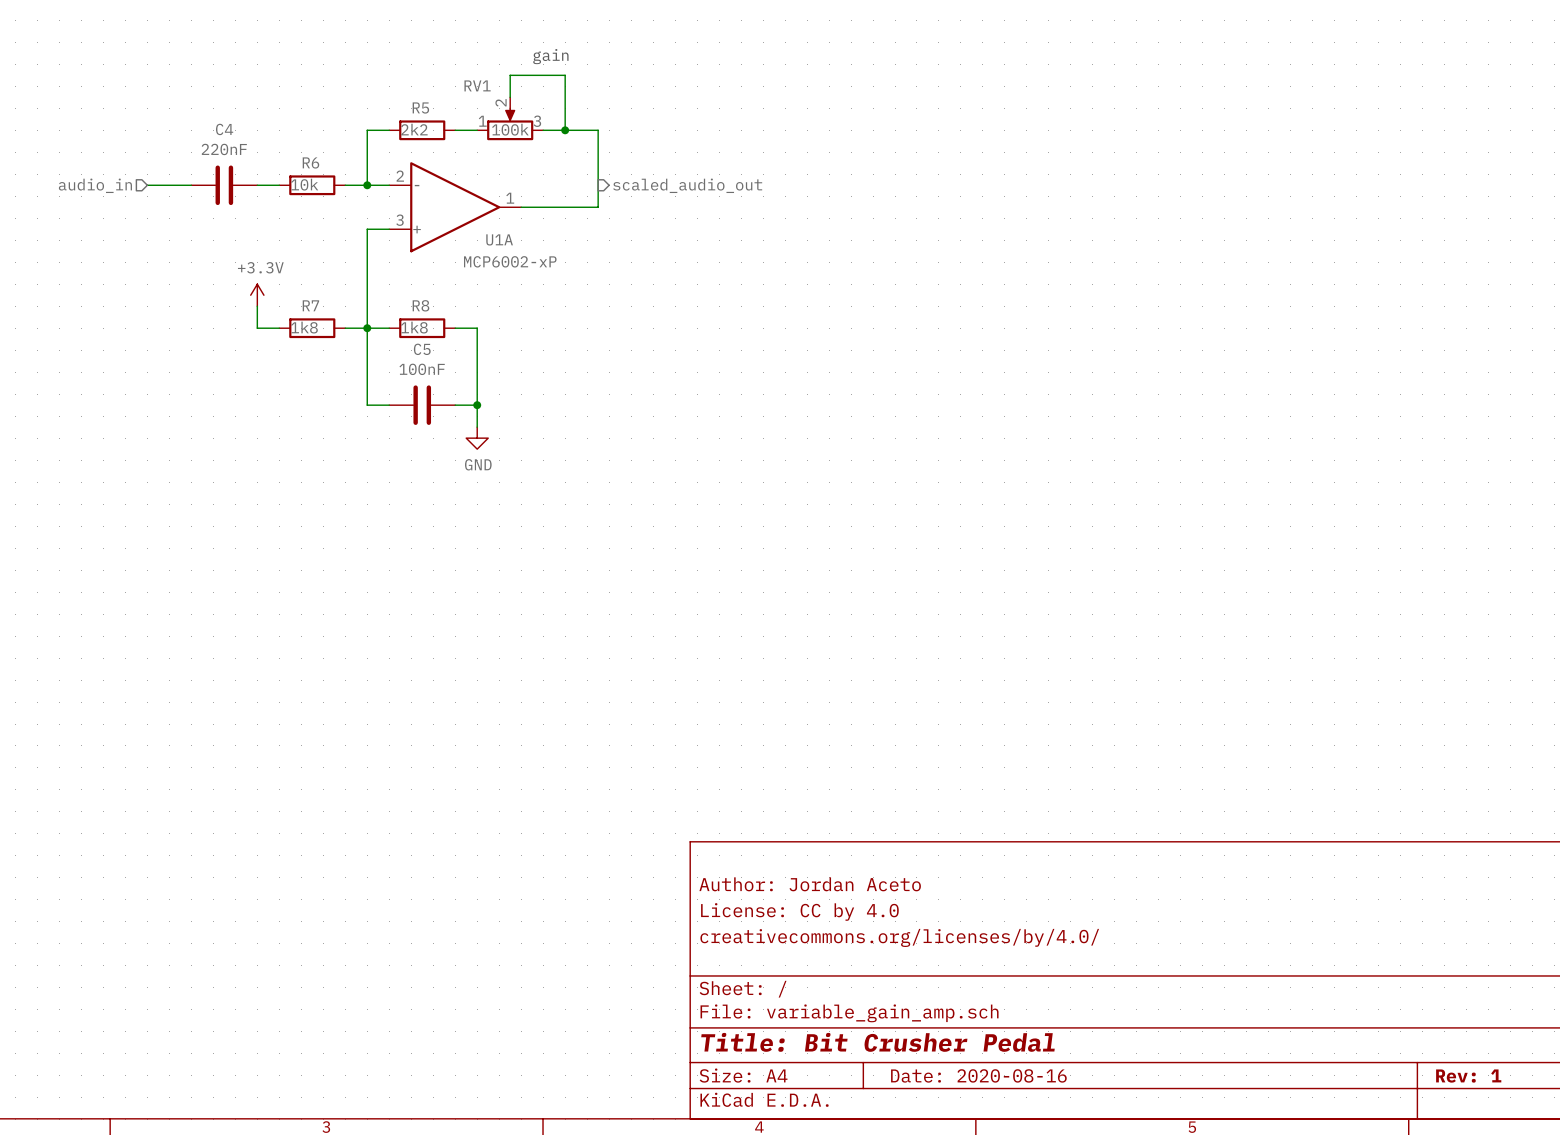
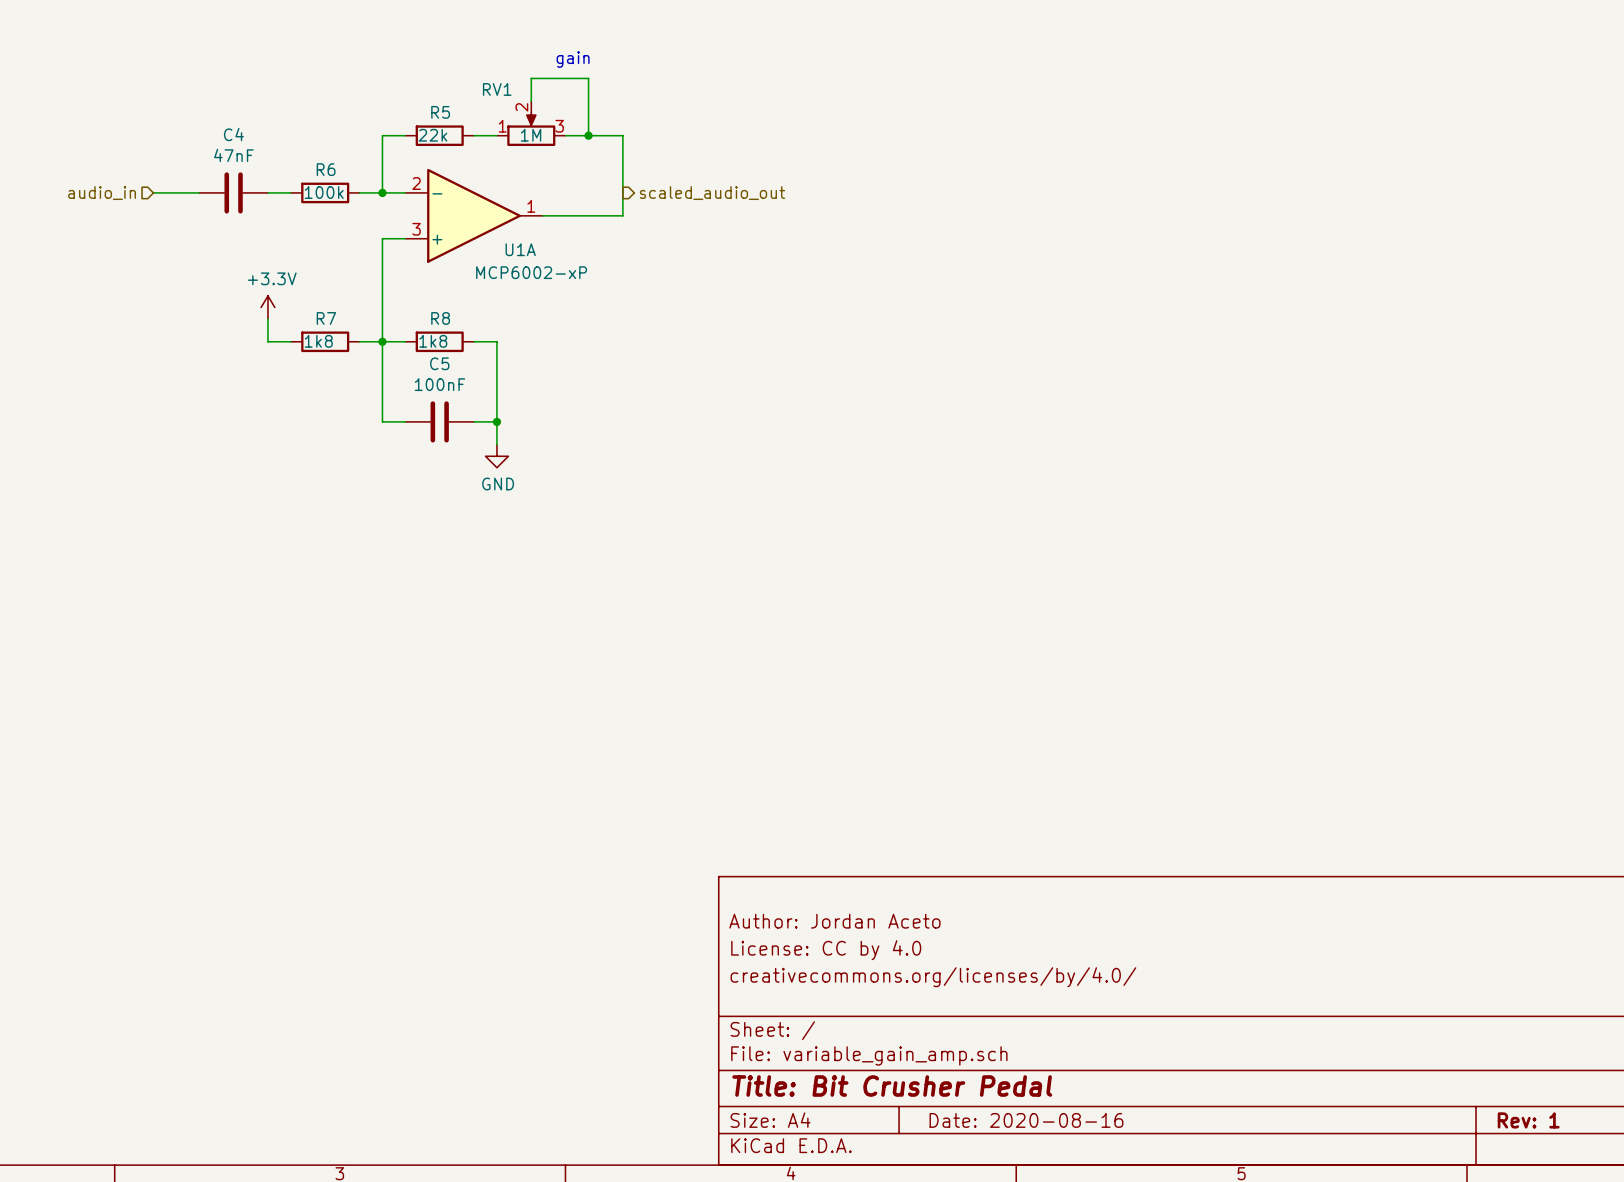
R5 value: 2k2 (414, 129) -> 22k (432, 135)
RV1 value: 100k (510, 129) -> 1M (531, 135)
C4 value: 220nF (224, 149) -> 47nF (233, 155)
R6 value: 10k (304, 184) -> 100k (324, 192)

